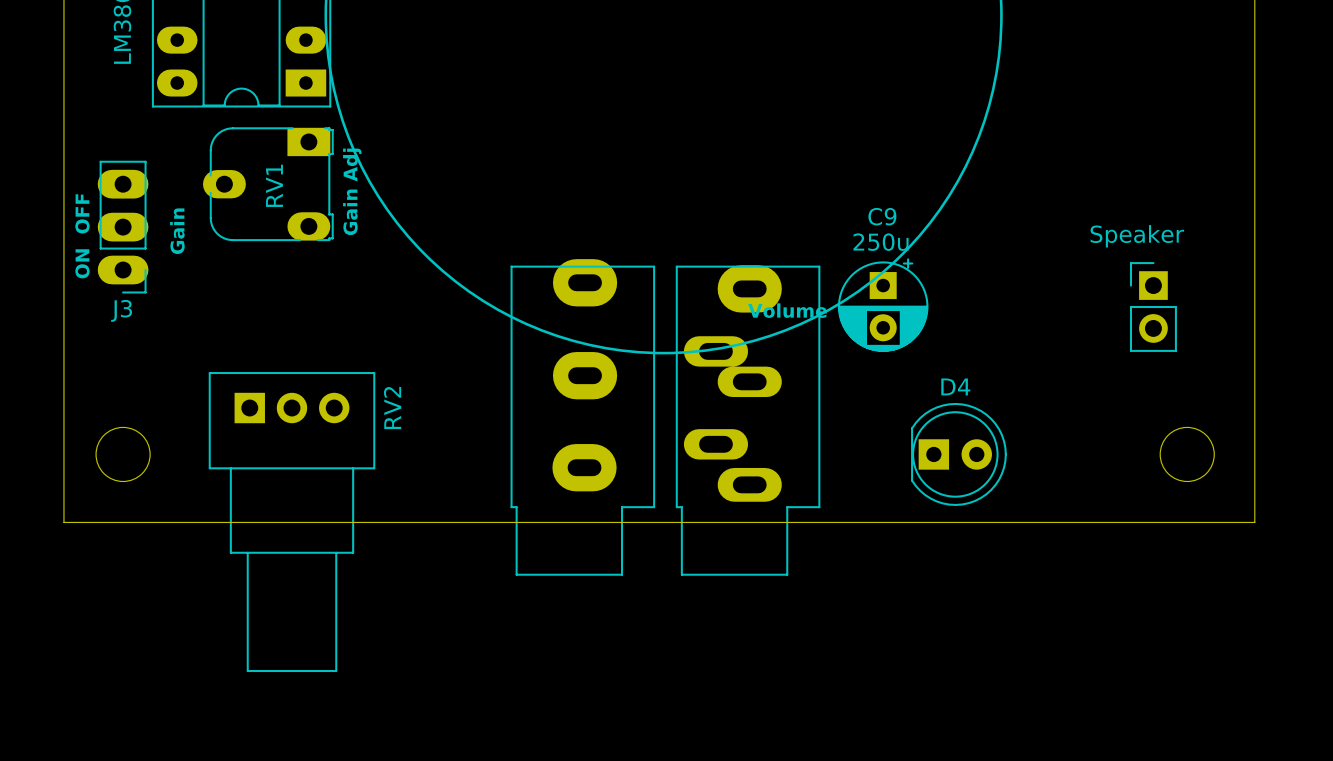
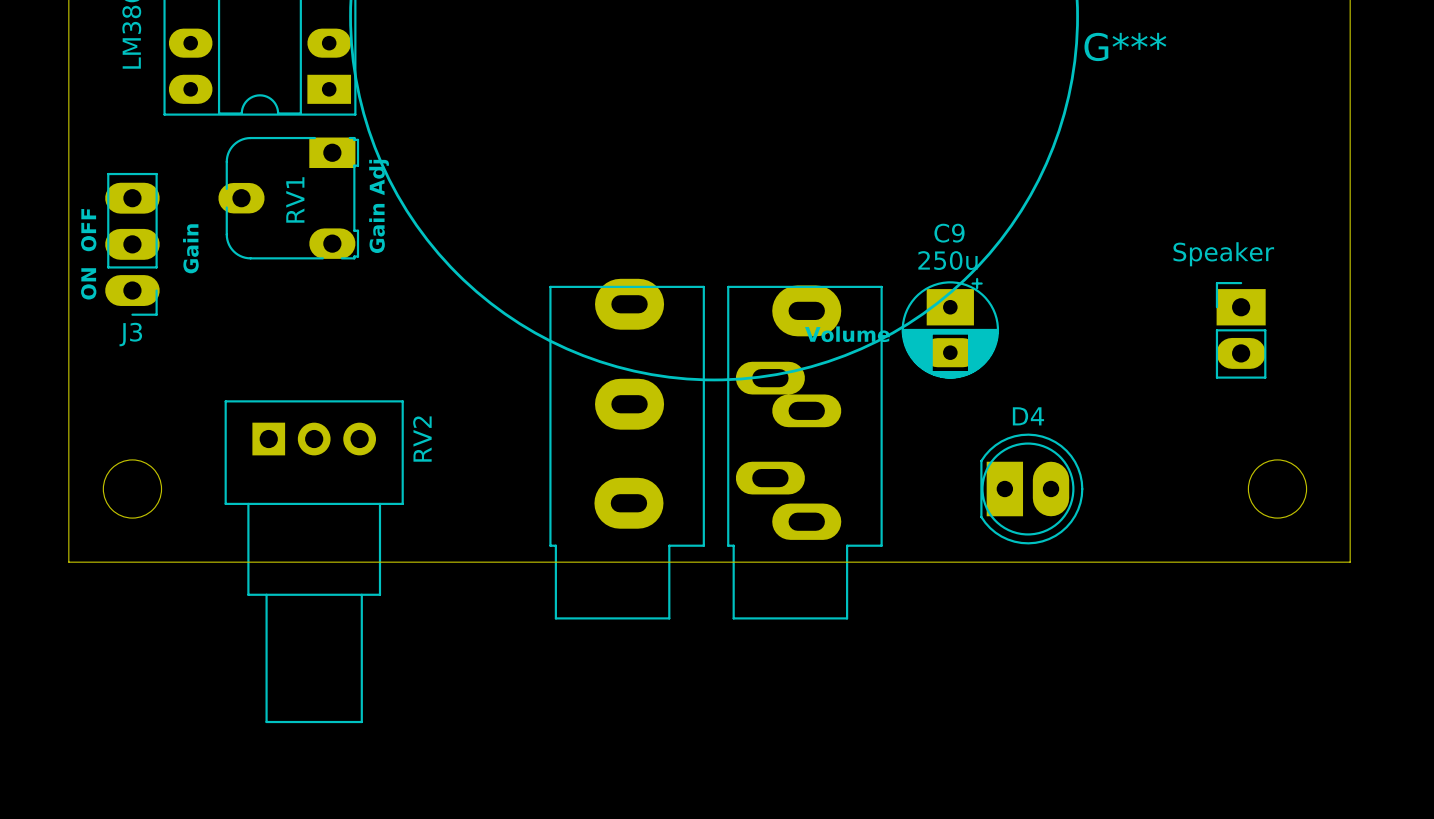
G***: none -> (1125, 46)
C9 footprint: [837, 258, 929, 352] -> [901, 277, 1000, 379]
part footprint: [1129, 262, 1177, 352] -> [1215, 281, 1267, 379]
D4 footprint: [911, 402, 1007, 506] -> [980, 433, 1084, 545]

